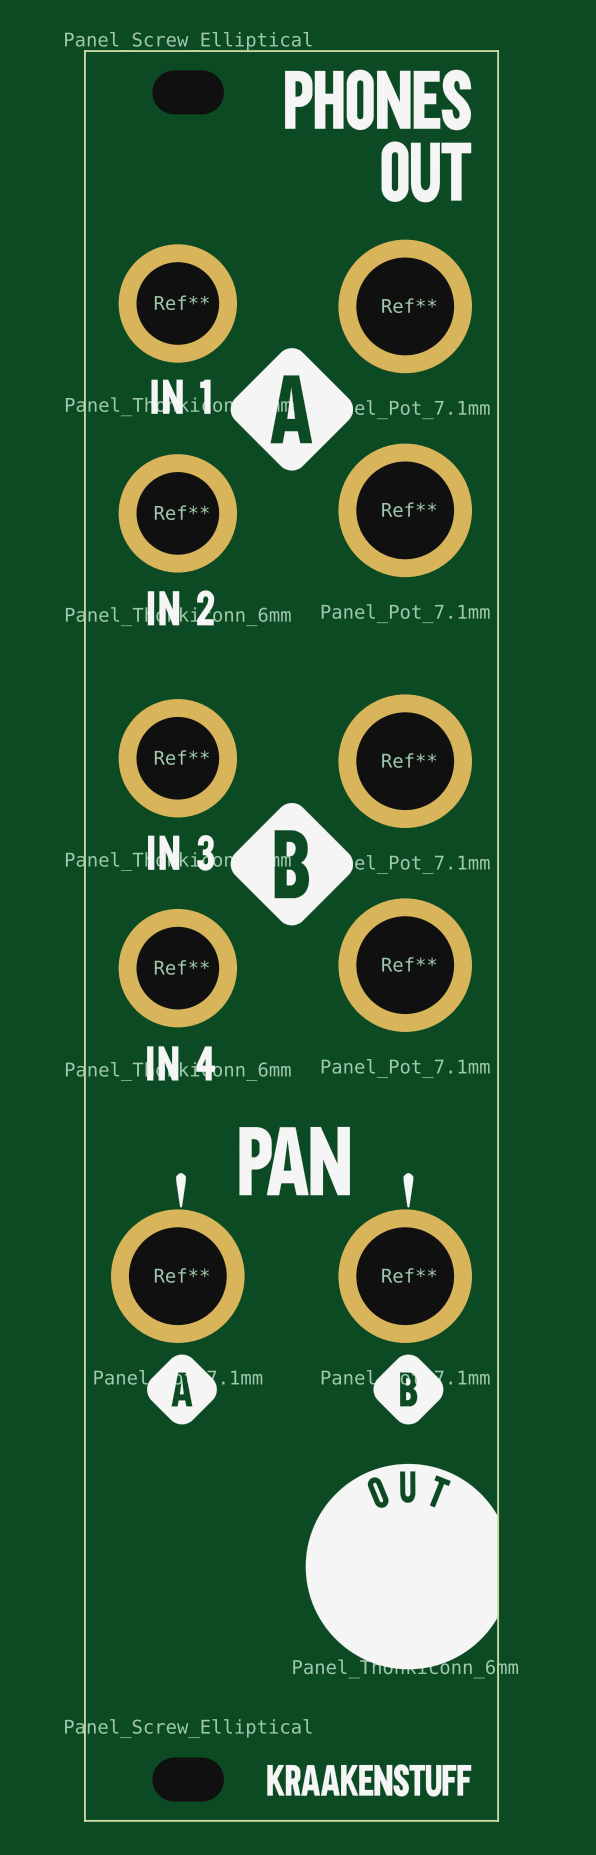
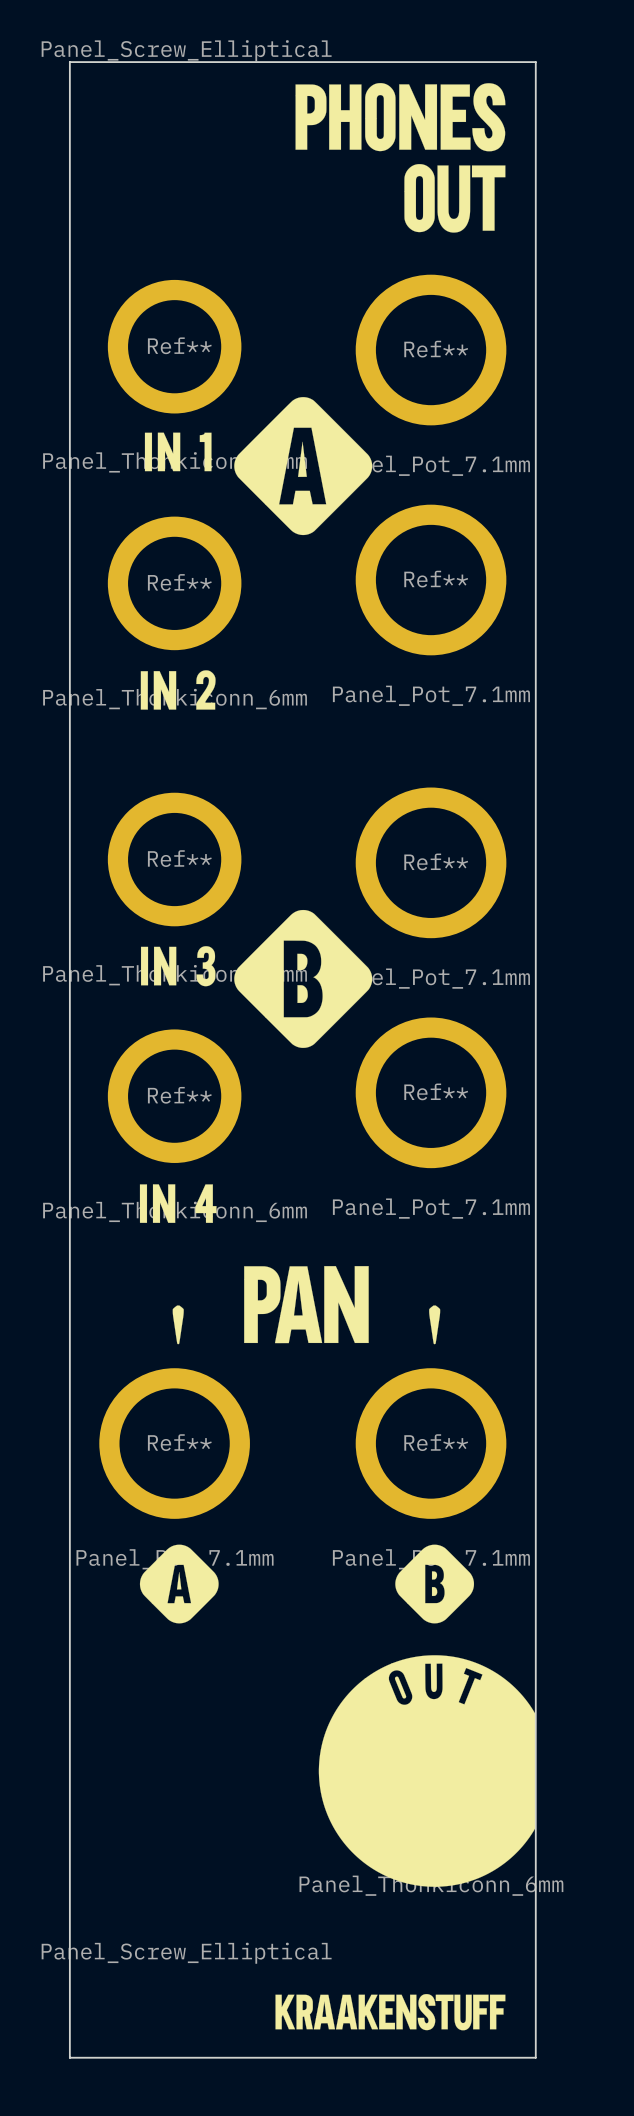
drawing shape: [147, 69, 499, 1797] -> [139, 83, 536, 2031]

